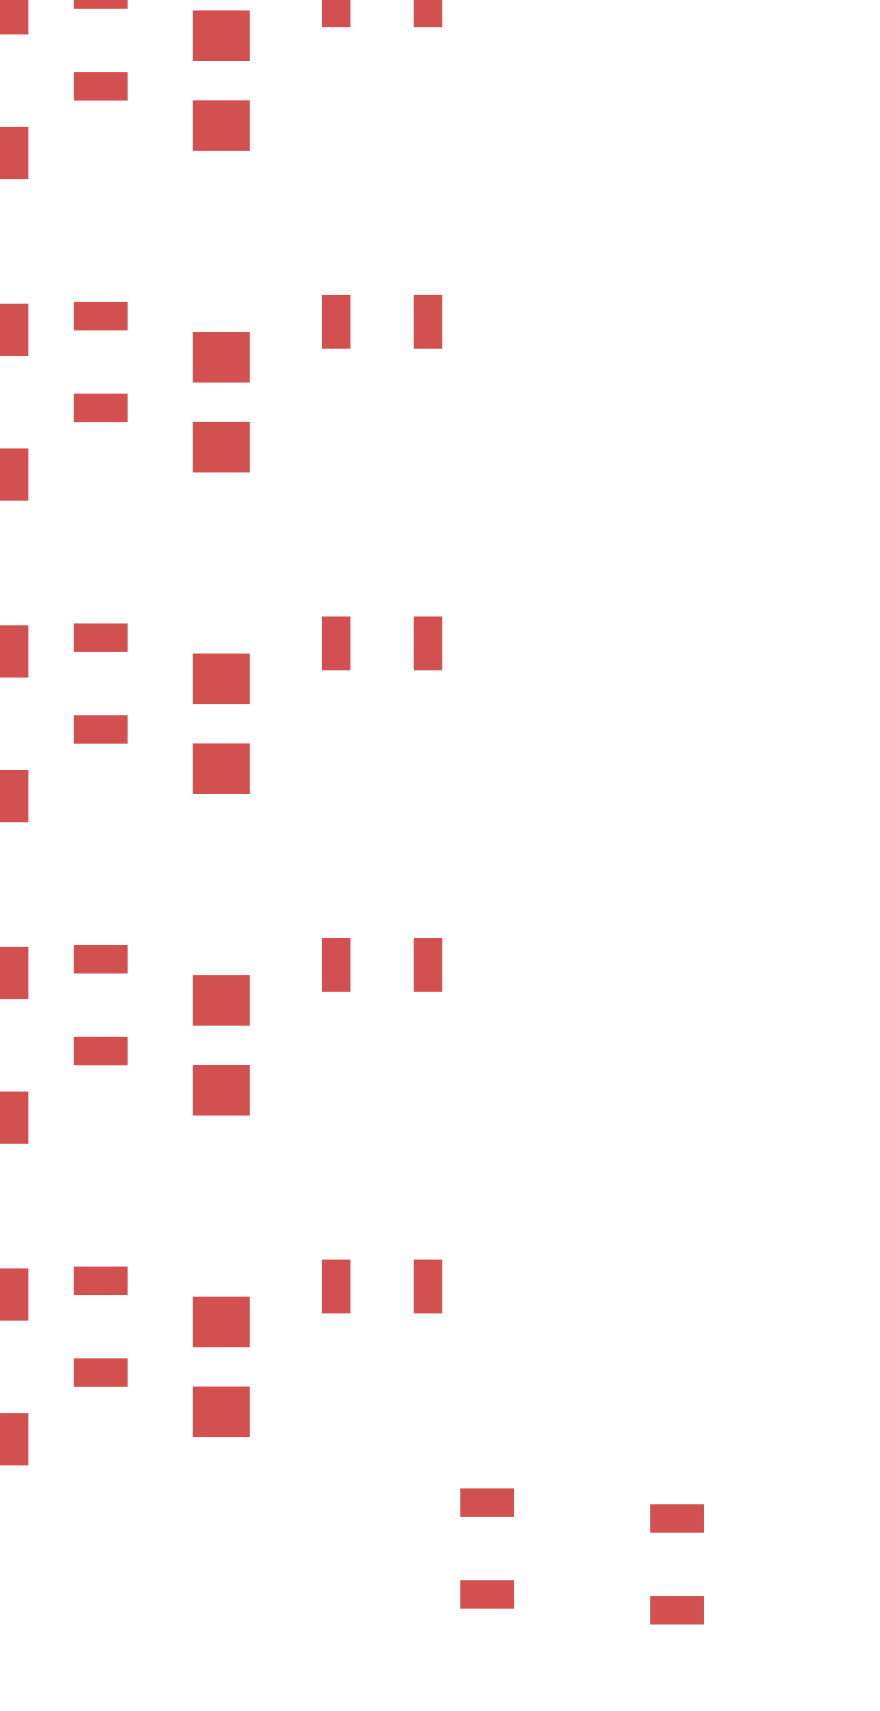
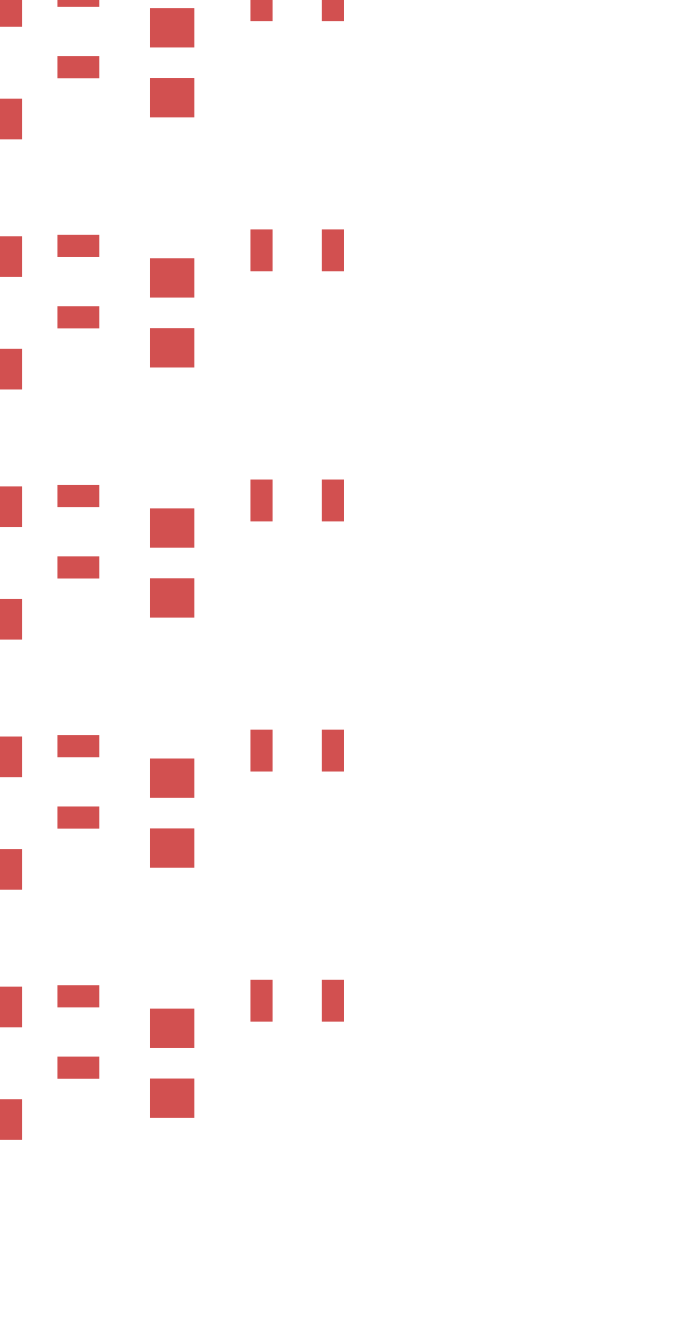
part: (487, 1548) -> none
part: (677, 1564) -> none

